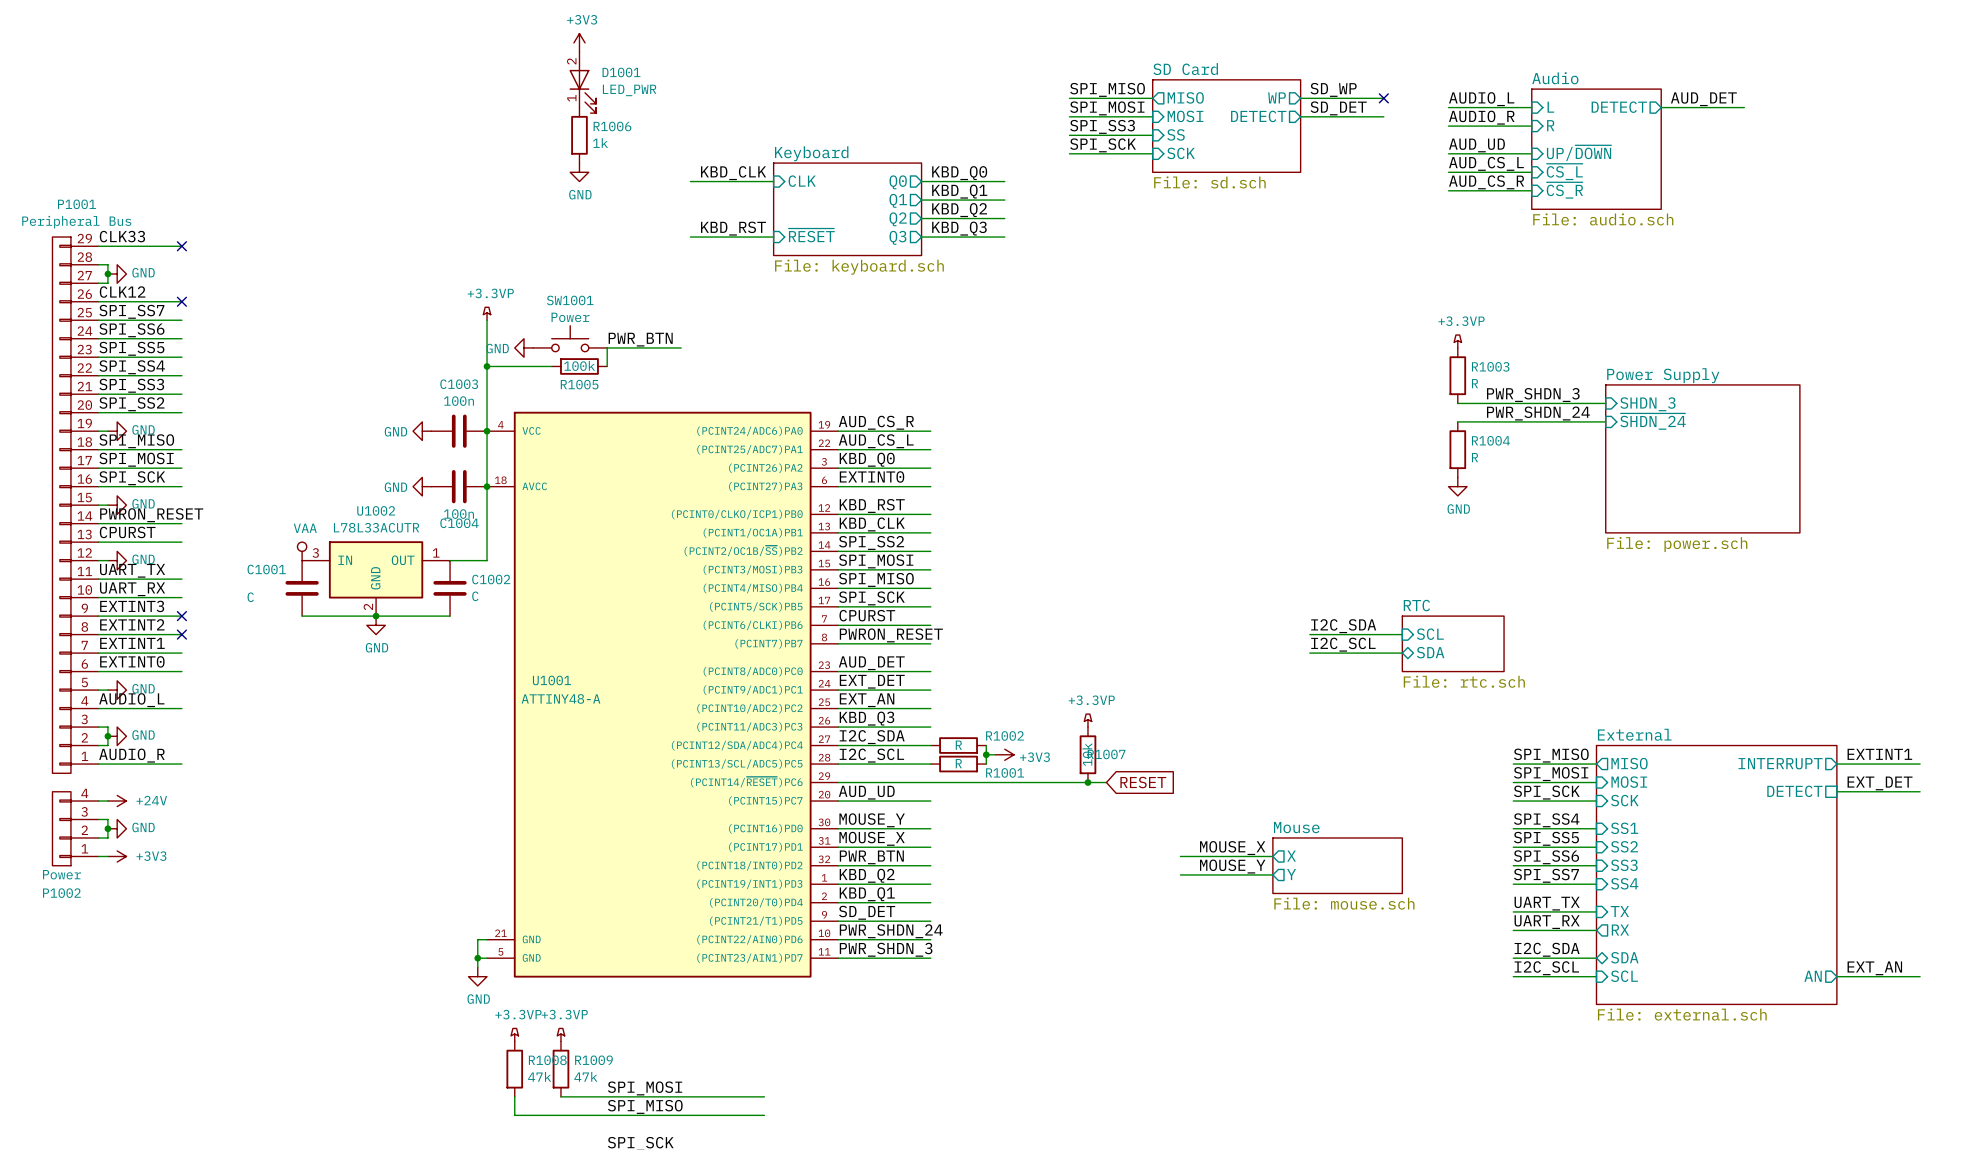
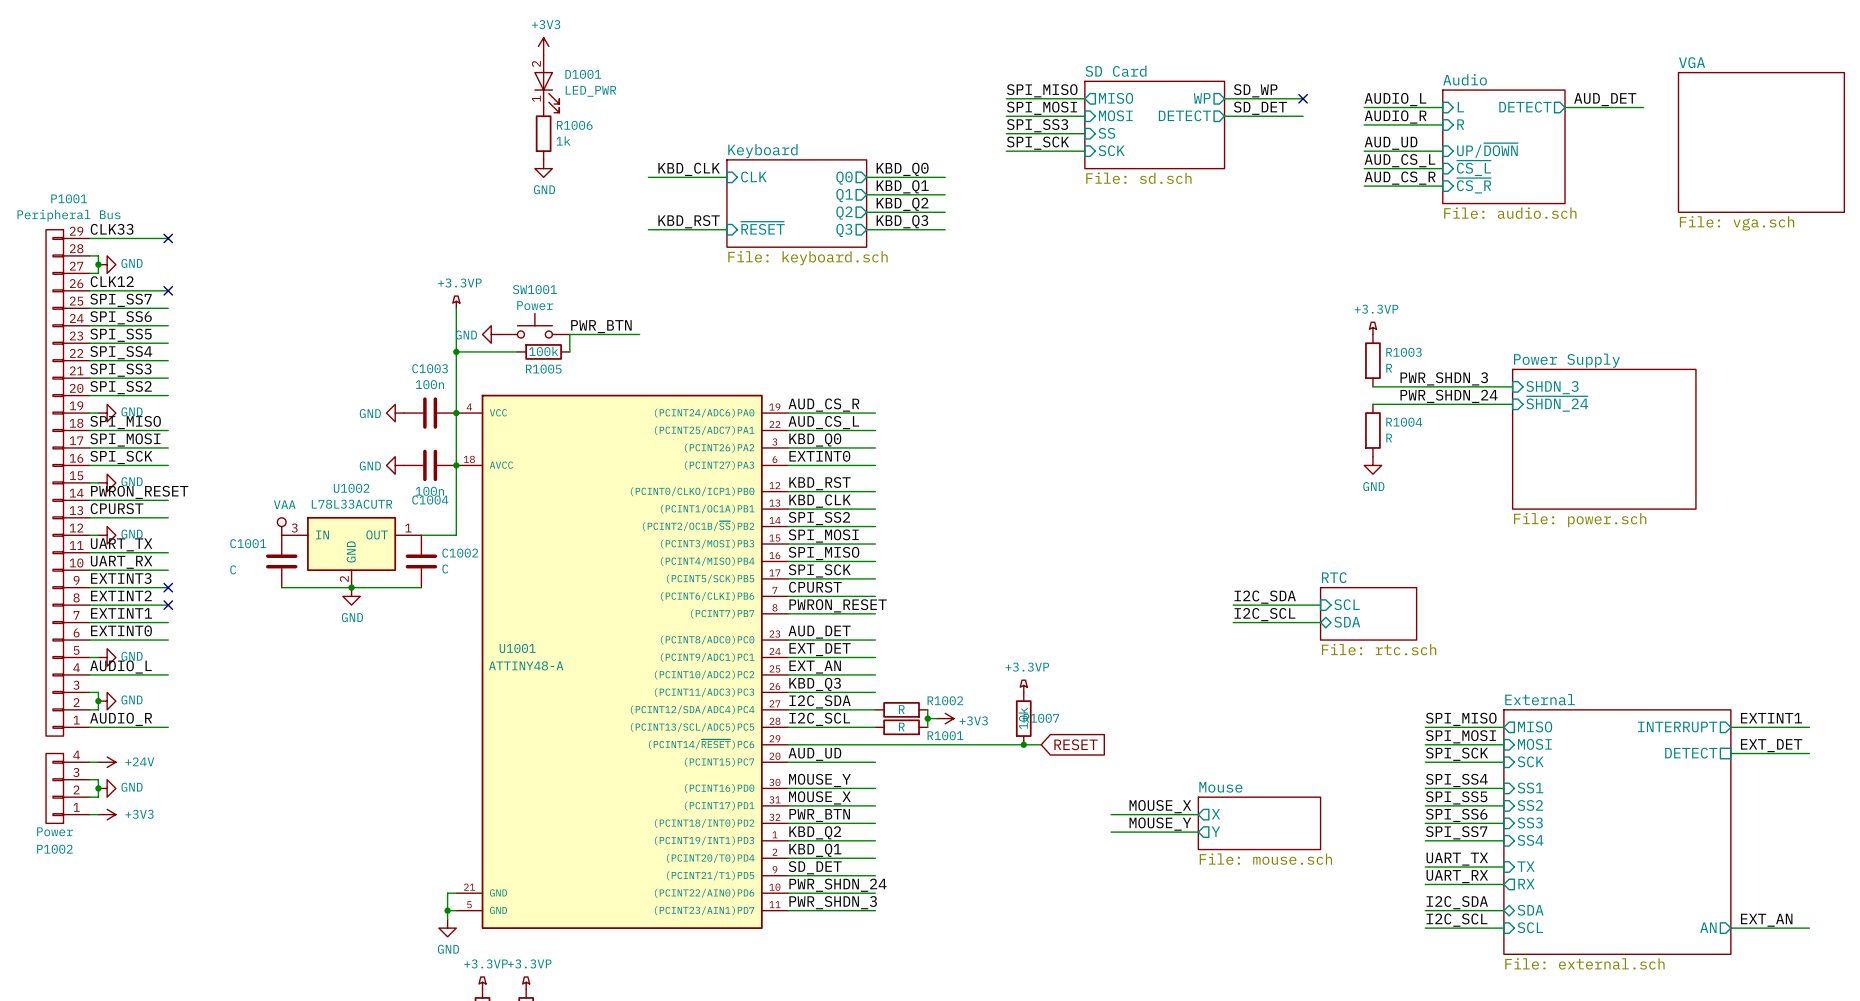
sheet VGA: none -> File: vga.sch (1761, 142)

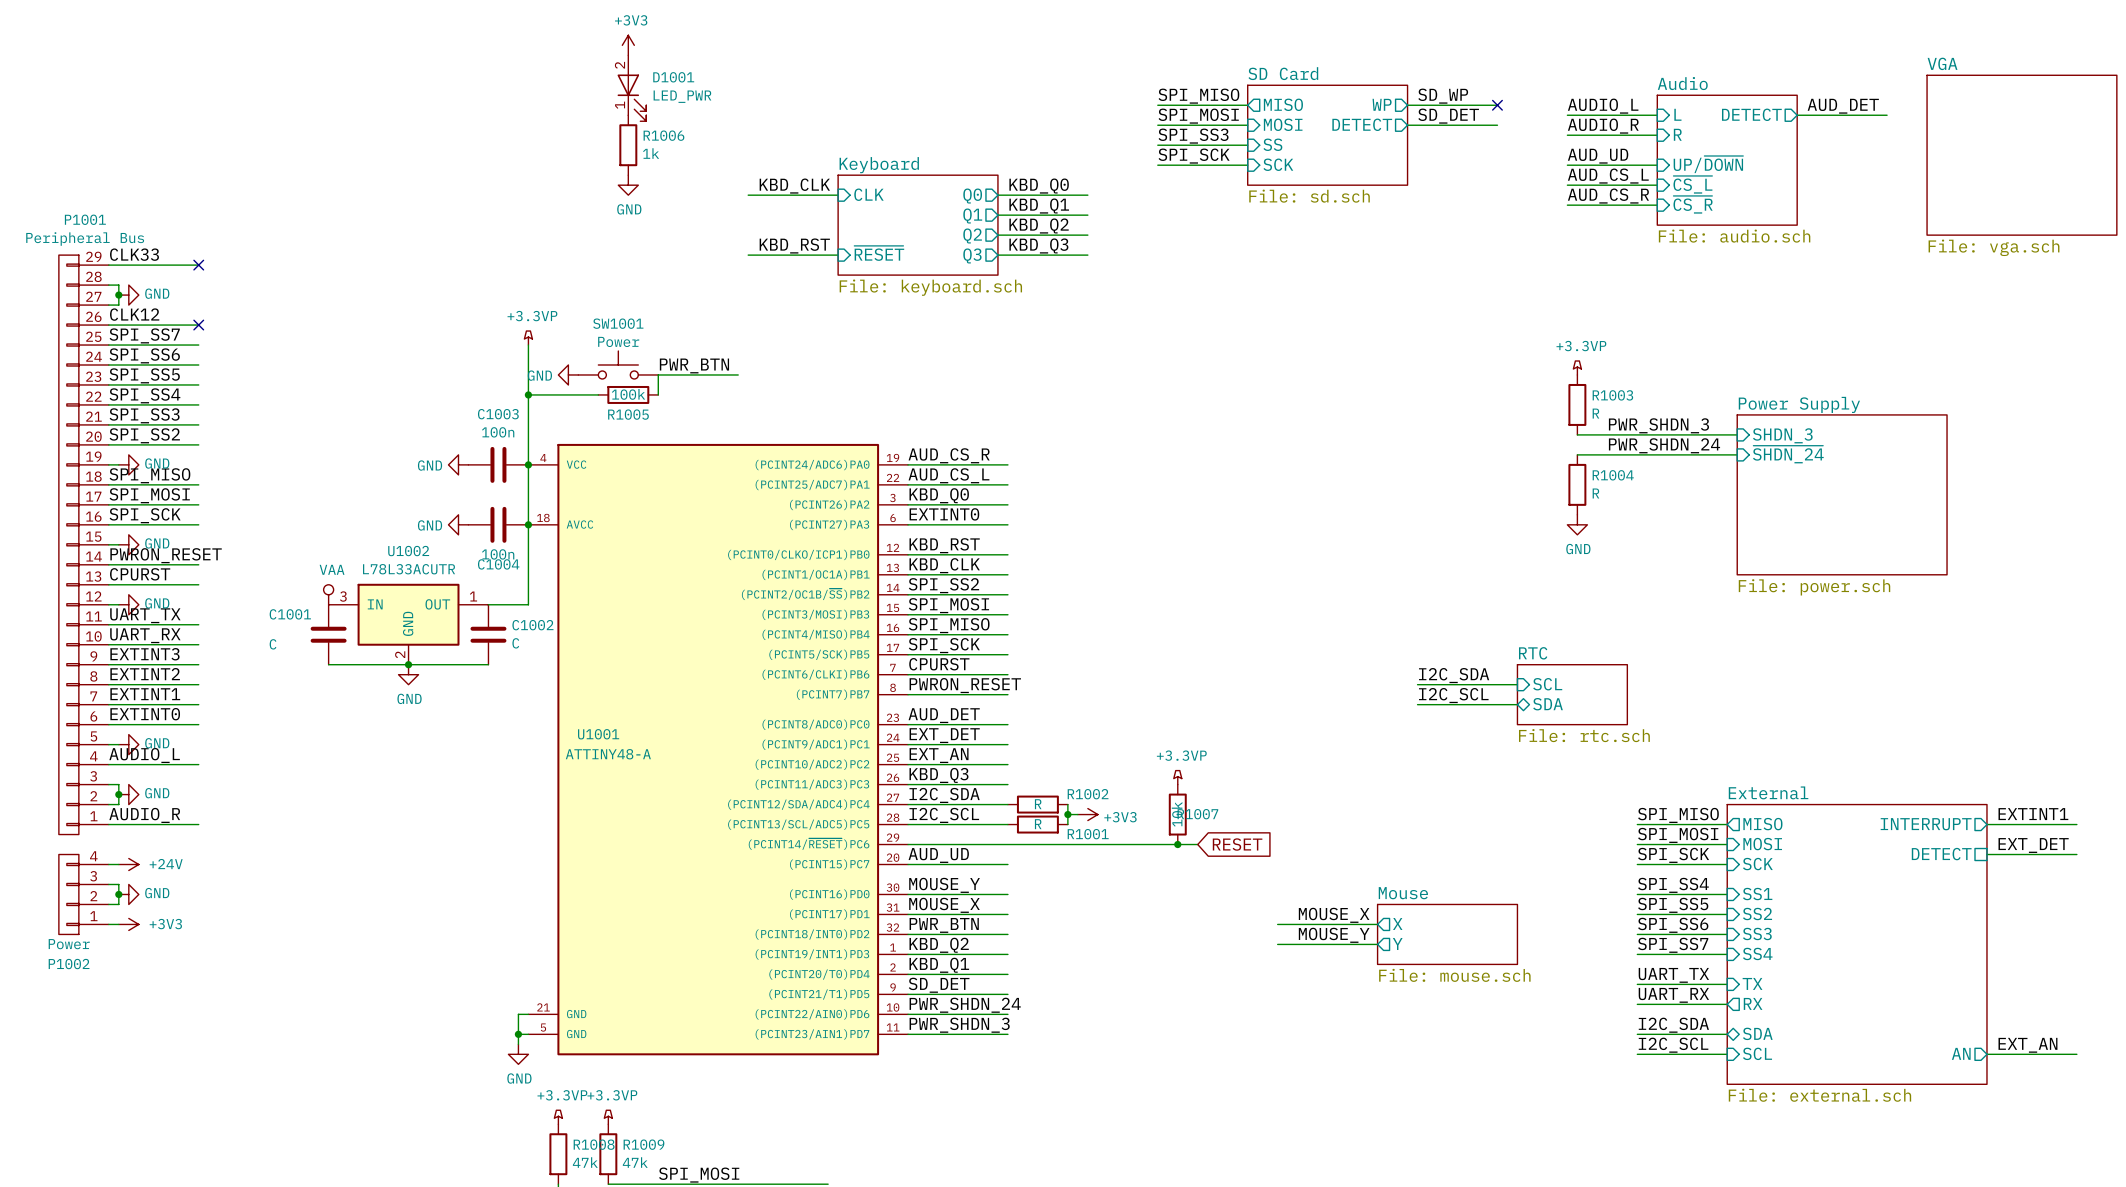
no-connect mark: (168, 587) -> none
no-connect mark: (168, 605) -> none

